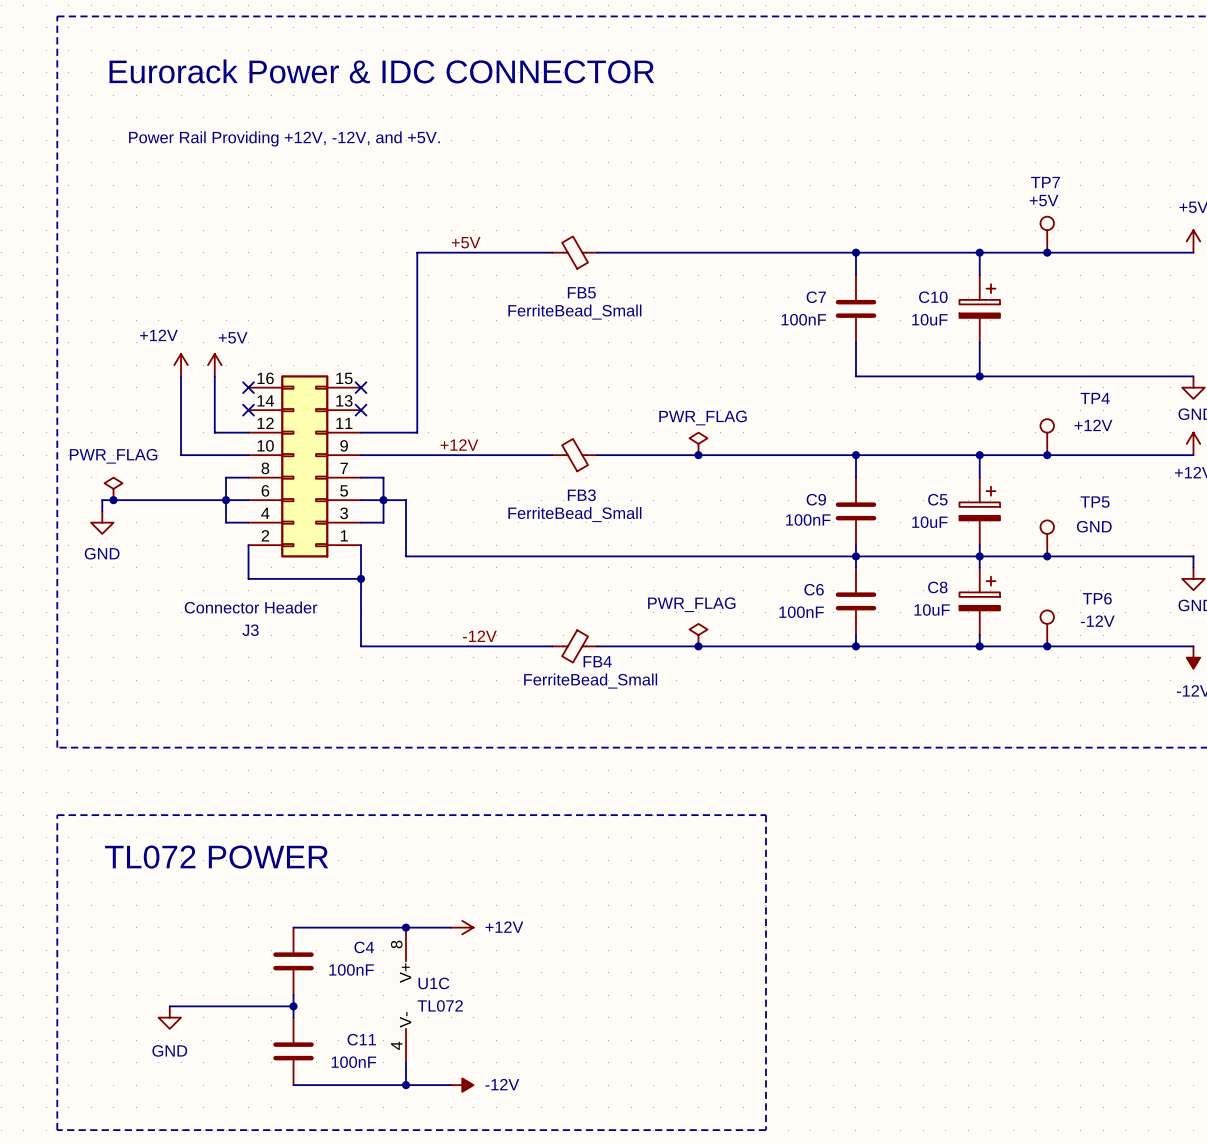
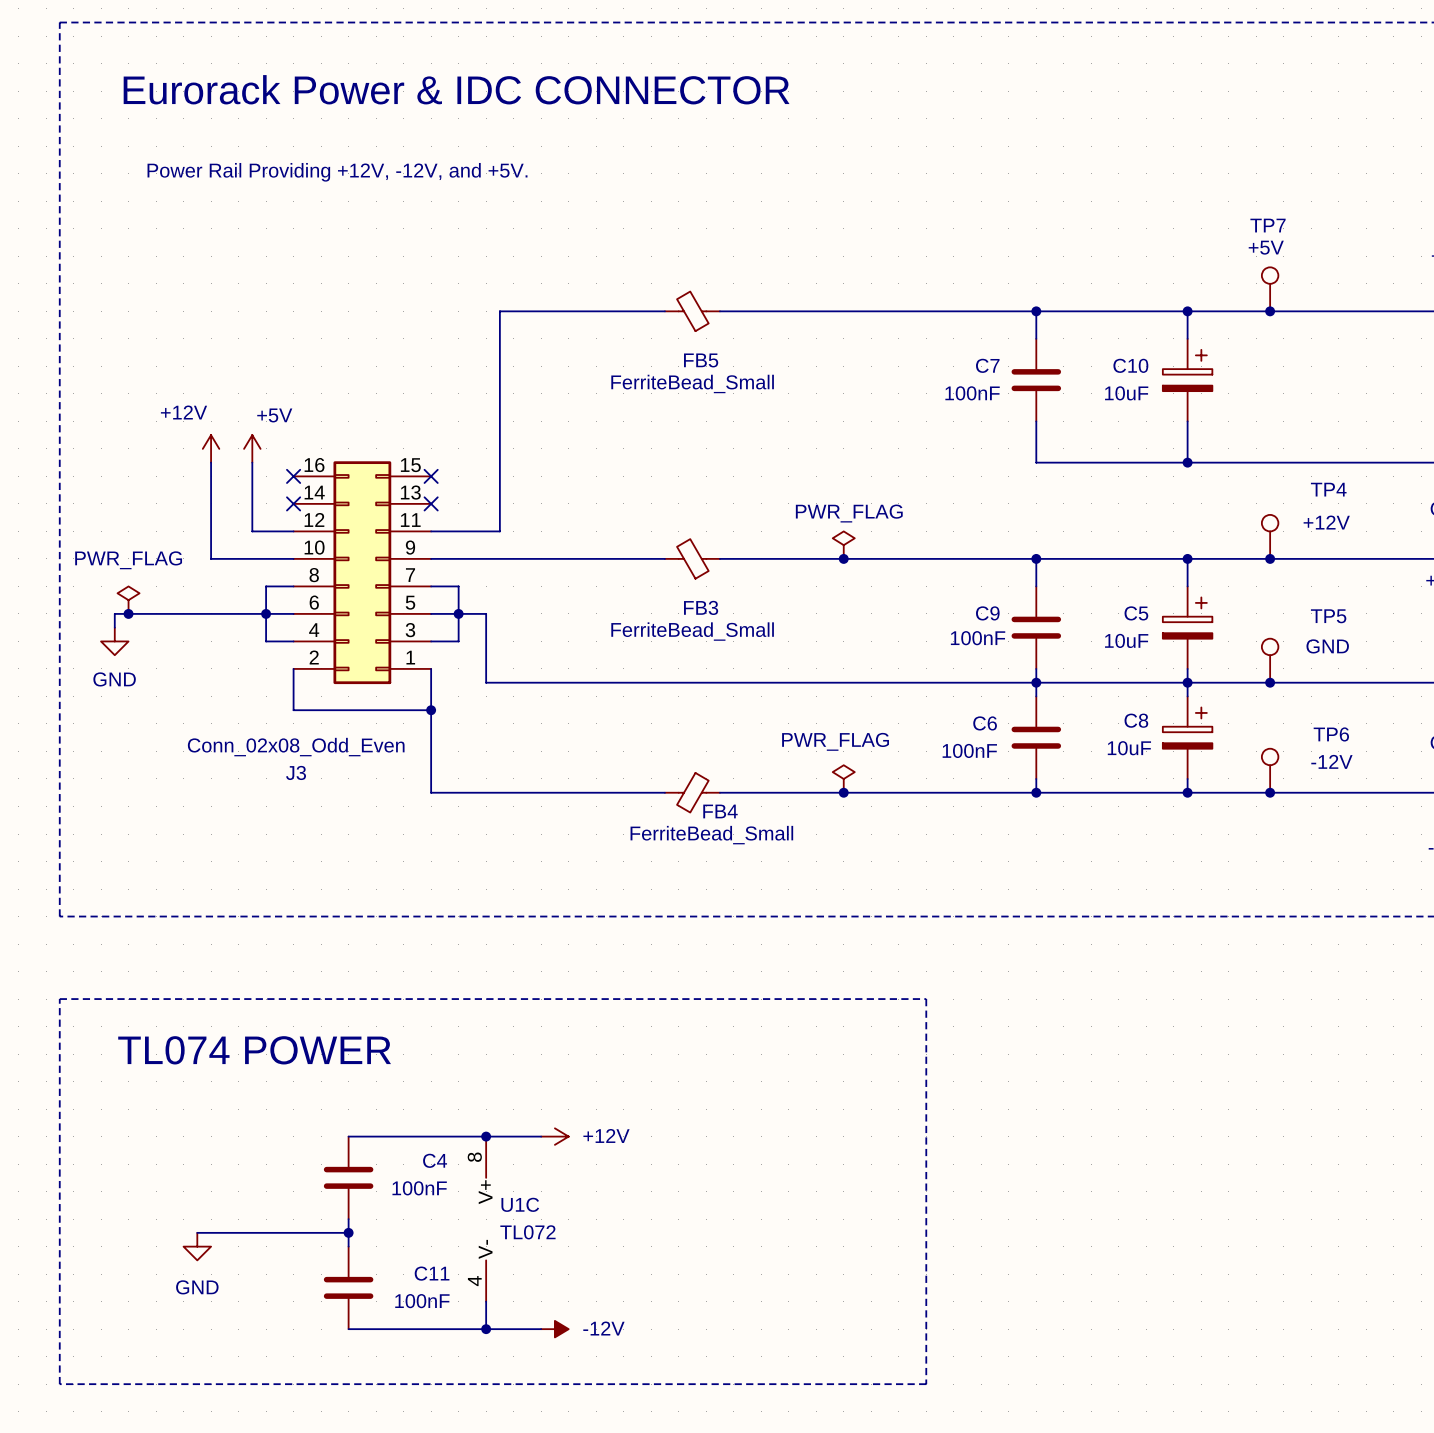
label: +5V (466, 242) -> none
label: +12V (459, 445) -> none
J3 value: Connector Header (251, 607) -> Conn_02x08_Odd_Even (296, 747)
label: -12V (479, 636) -> none
text: TL072 POWER (216, 857) -> TL074 POWER (254, 1050)

